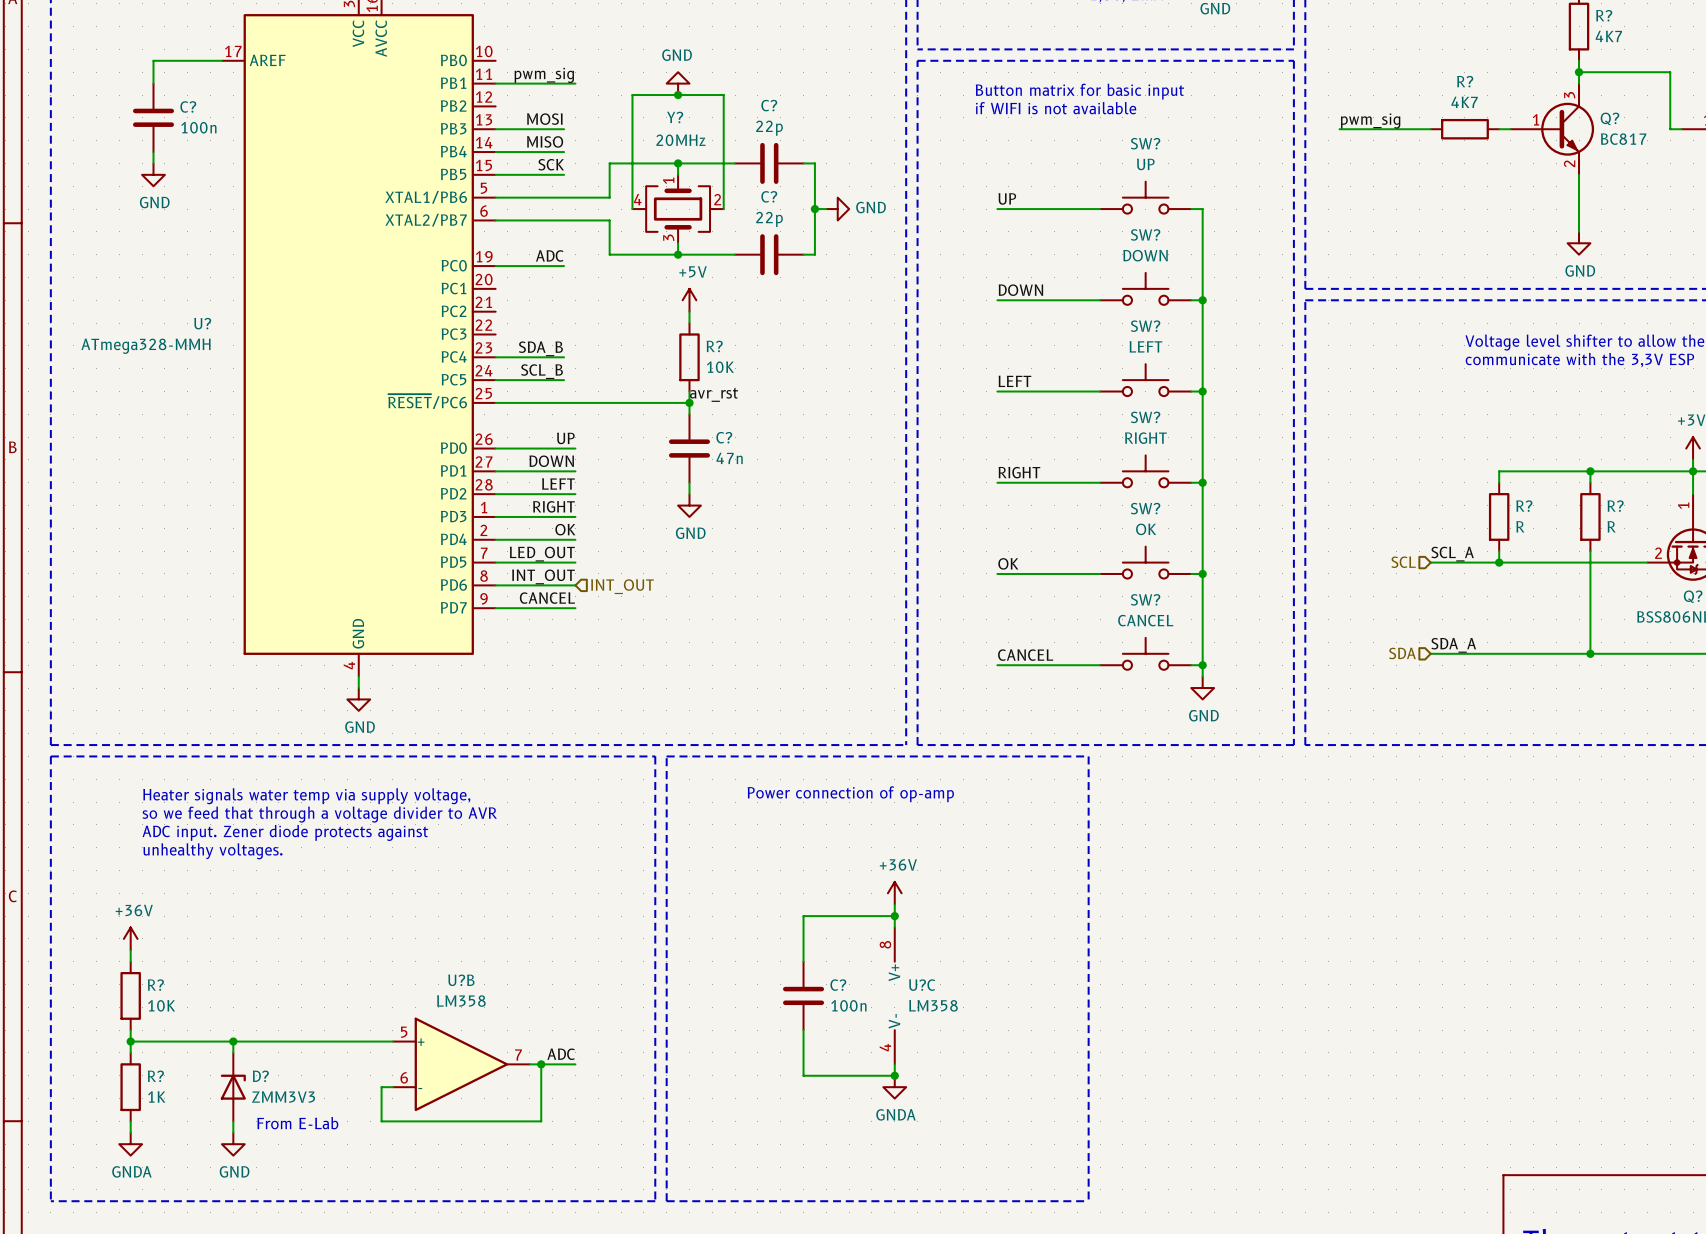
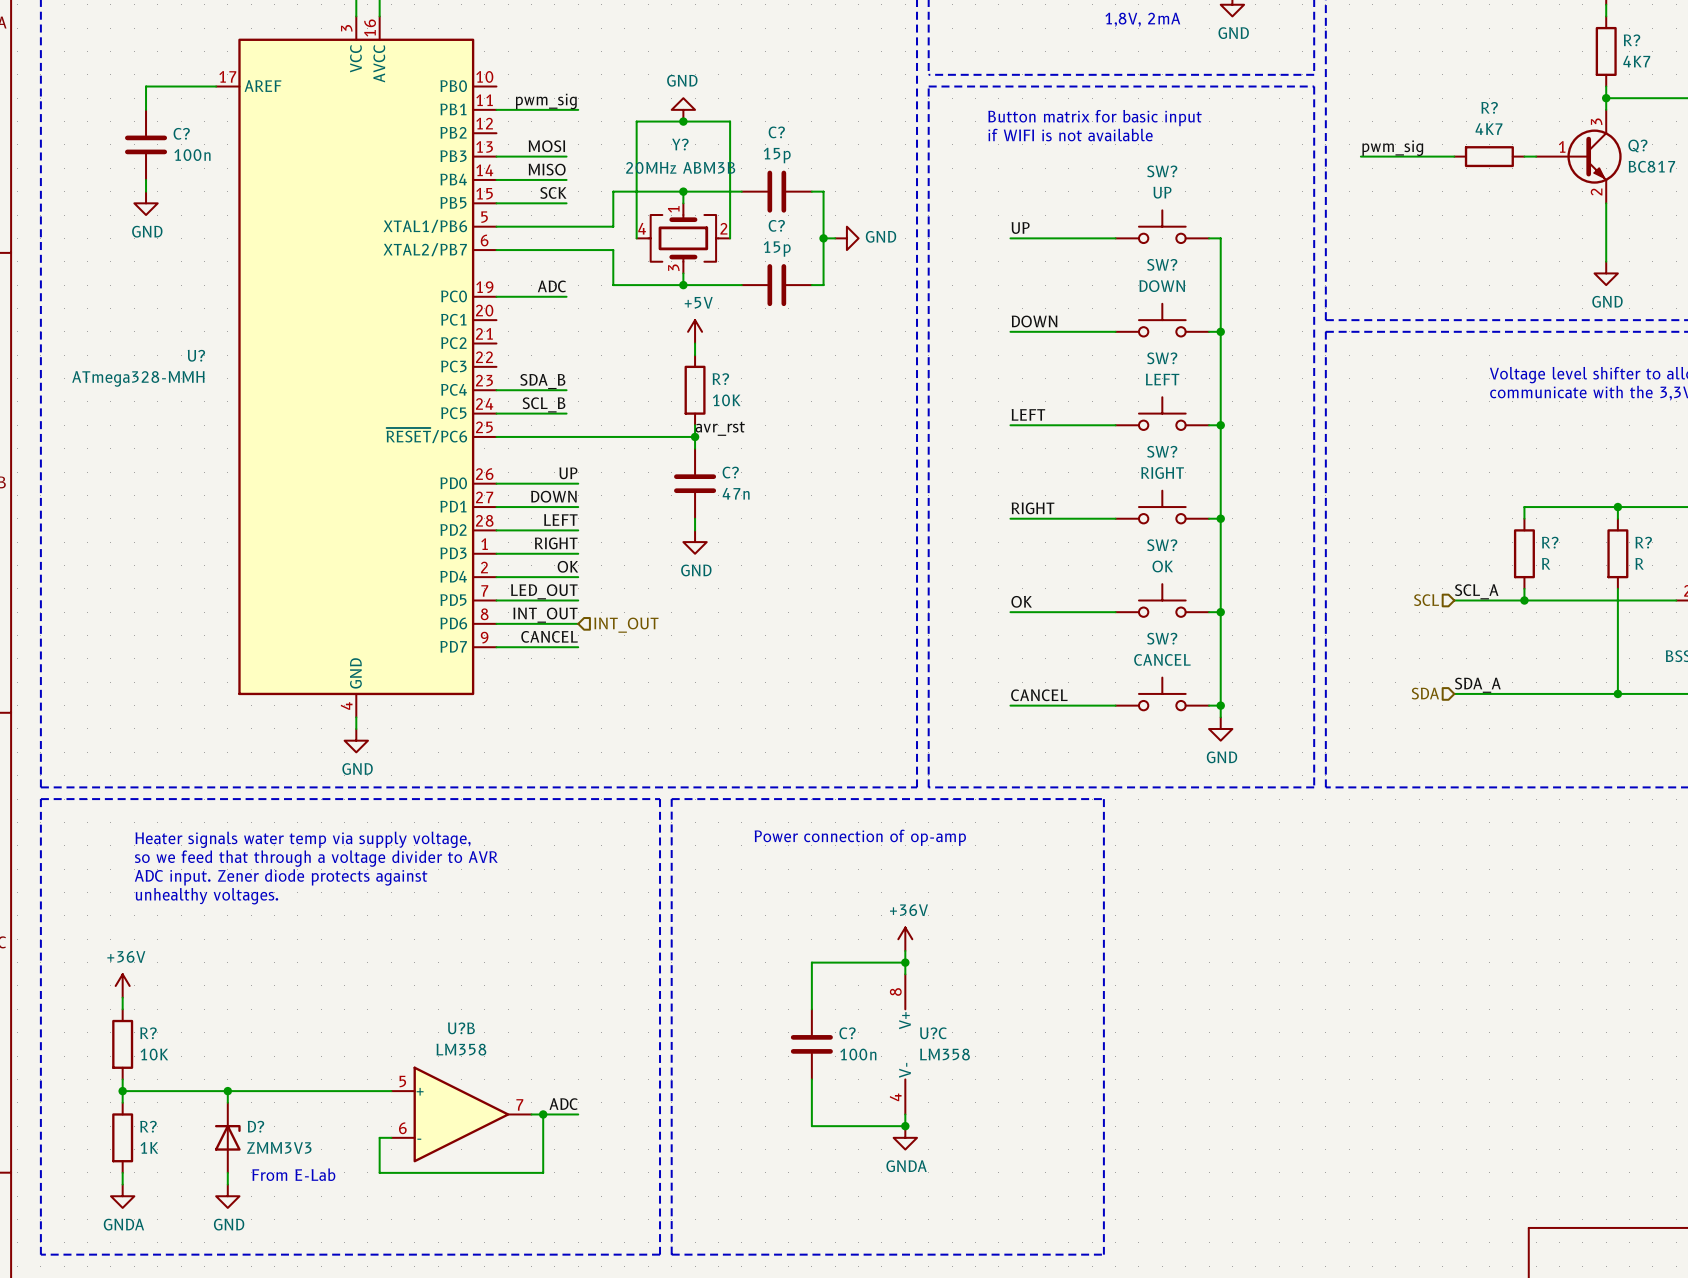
C? value: 22p (769, 128) -> 15p (777, 155)
Y? value: 20MHz (680, 140) -> 20MHz ABM3B (680, 167)
C? value: 22p (769, 219) -> 15p (777, 248)

